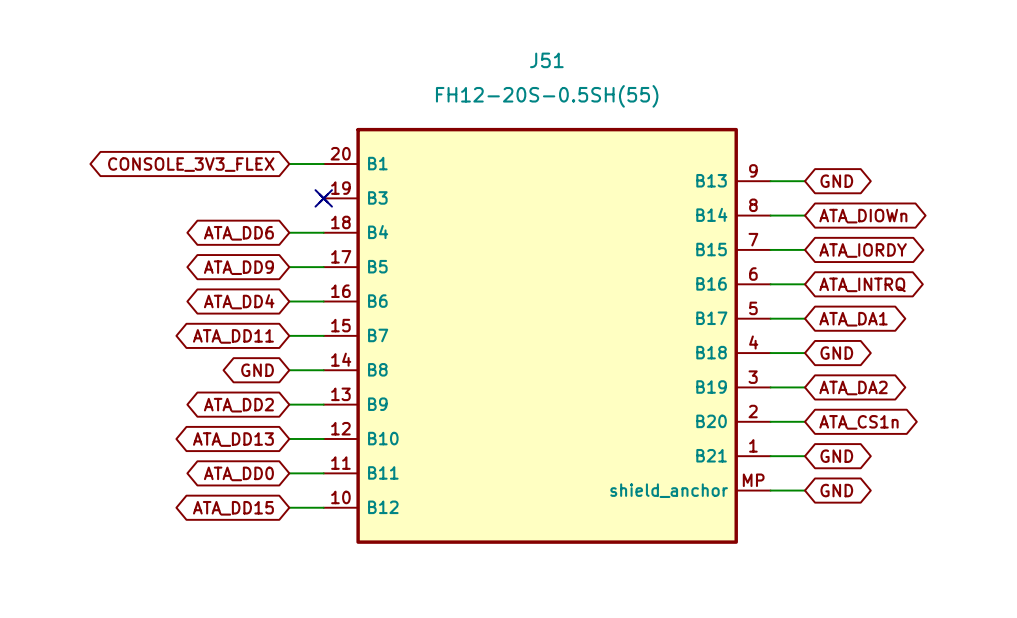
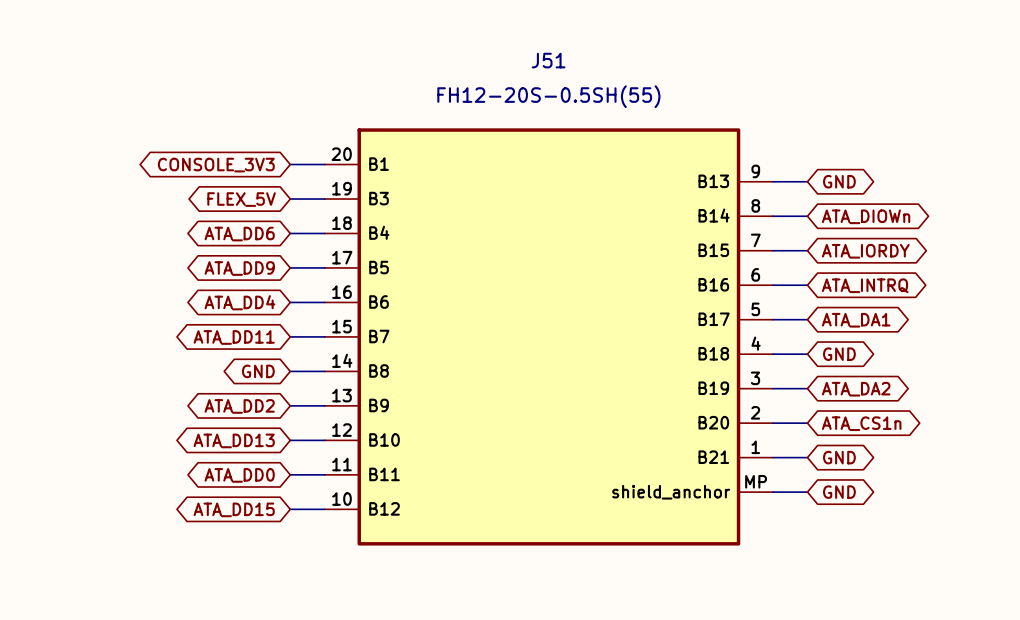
J51 symbol: [319, 127, 771, 544] -> [324, 128, 774, 546]
global label: CONSOLE_3V3_FLEX (191, 164) -> CONSOLE_3V3 (216, 165)
global label: none -> FLEX_5V (241, 199)
wire: none -> (290, 199) (324, 199)
no-connect mark: (323, 198) -> none

